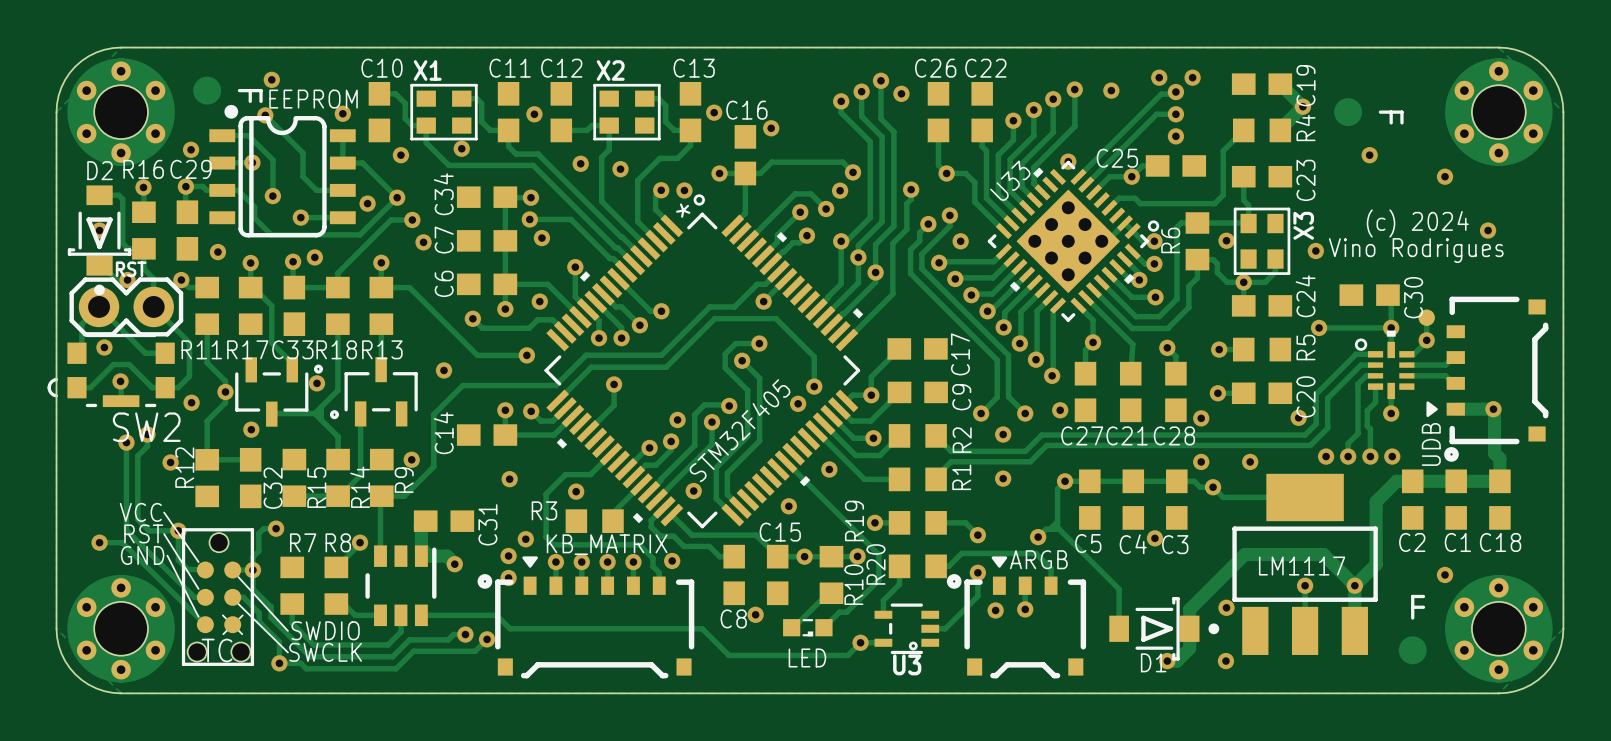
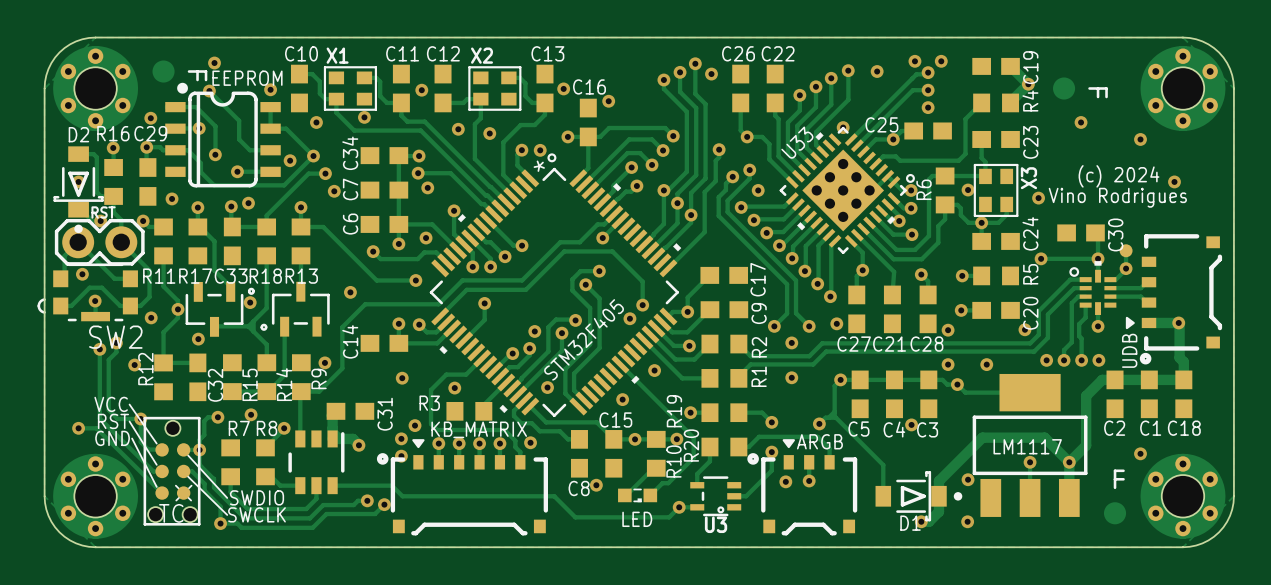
track: none -> (663, 150) (652, 139) (629, 139) (584, 184)
via: none -> (251, 414)

